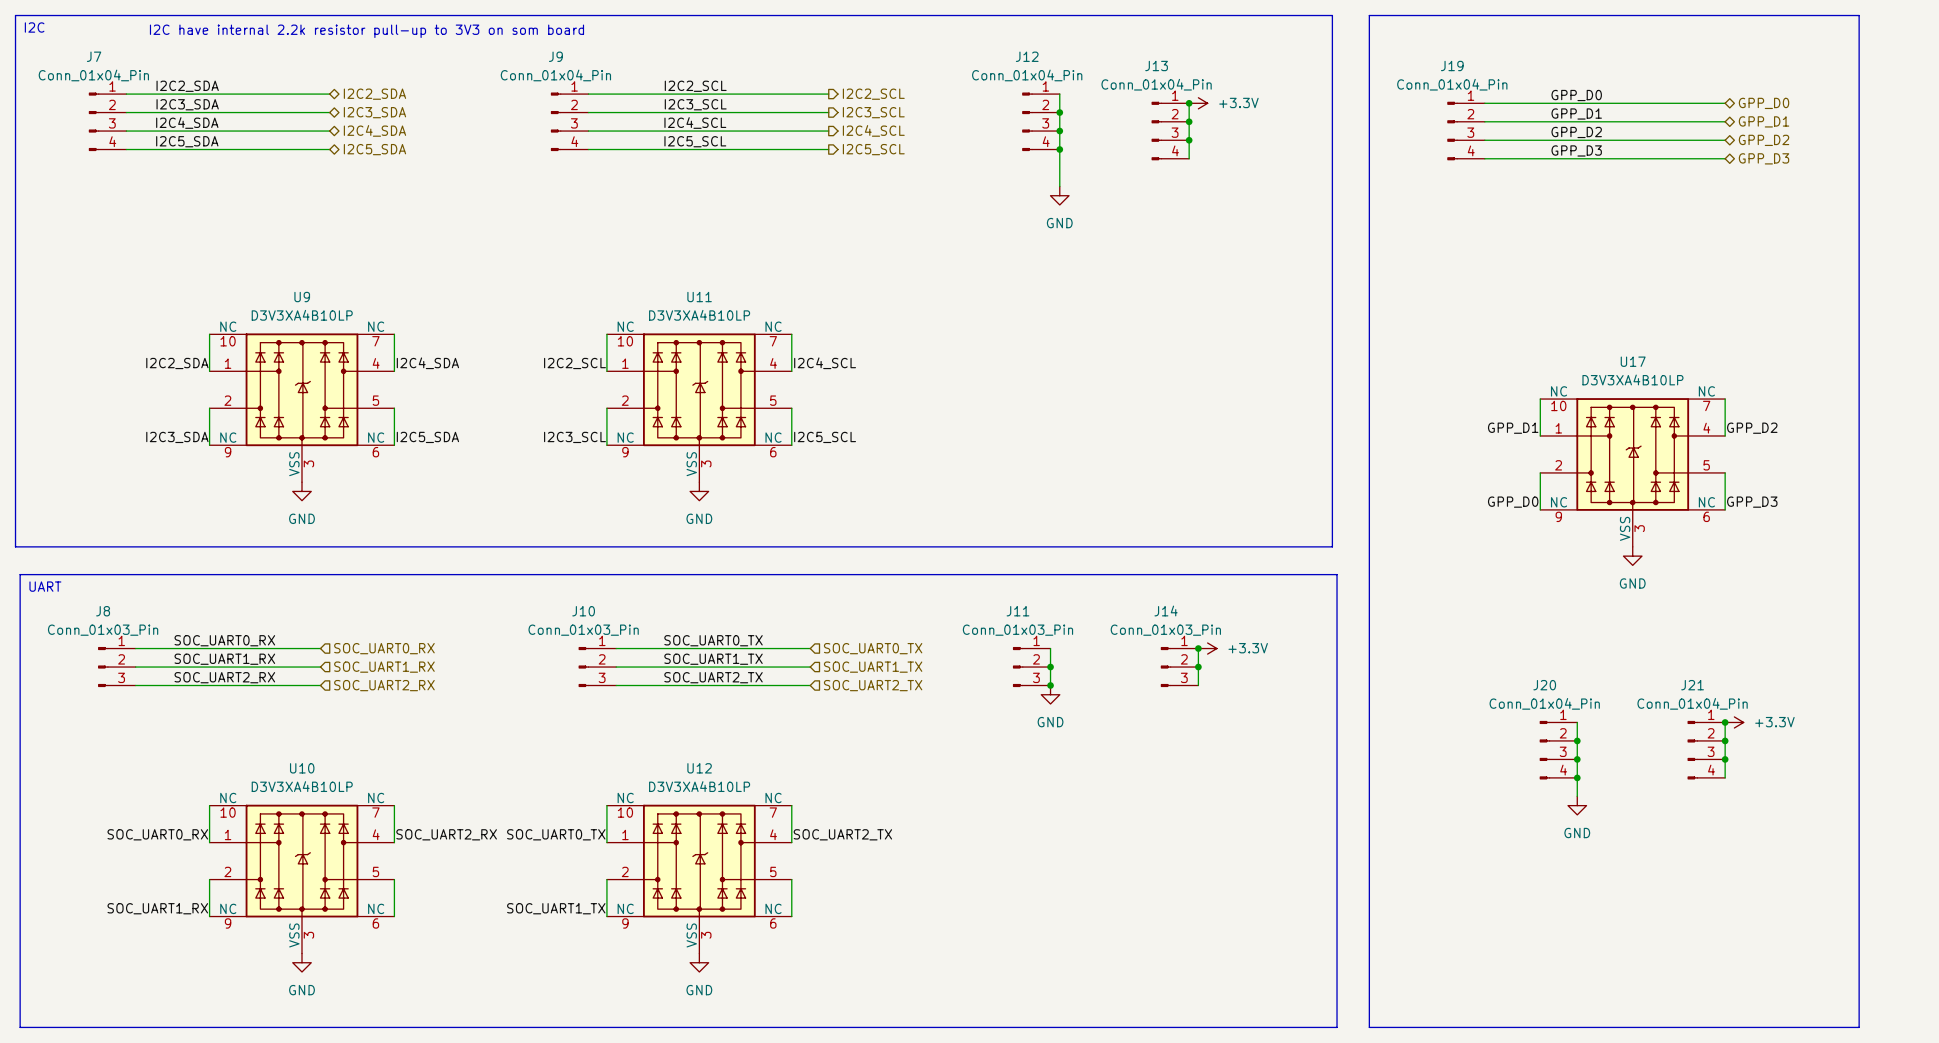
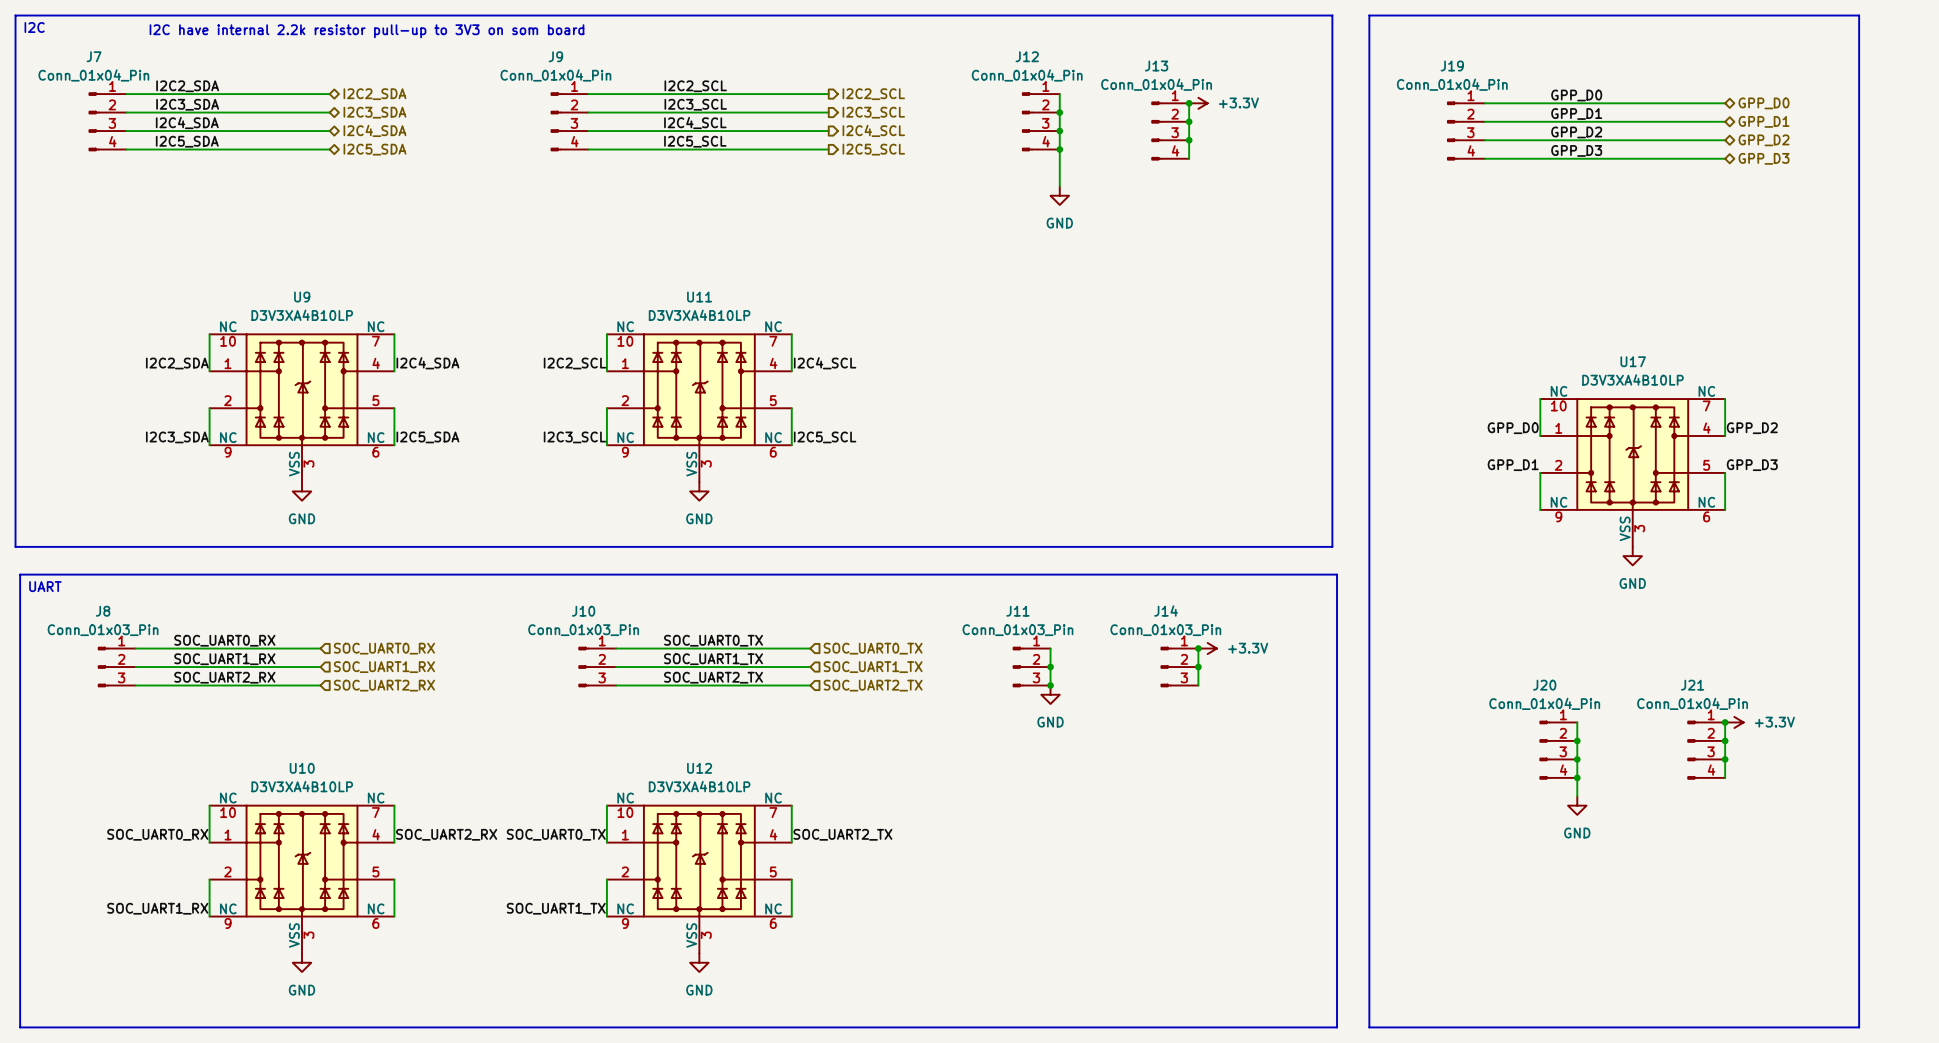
label: GPP_D1 (1513, 428) -> GPP_D0 (1513, 428)
label: none -> GPP_D1 (1513, 465)
label: GPP_D0 (1513, 502) -> none
label position: GPP_D3 (1752, 502) -> GPP_D3 (1752, 465)

